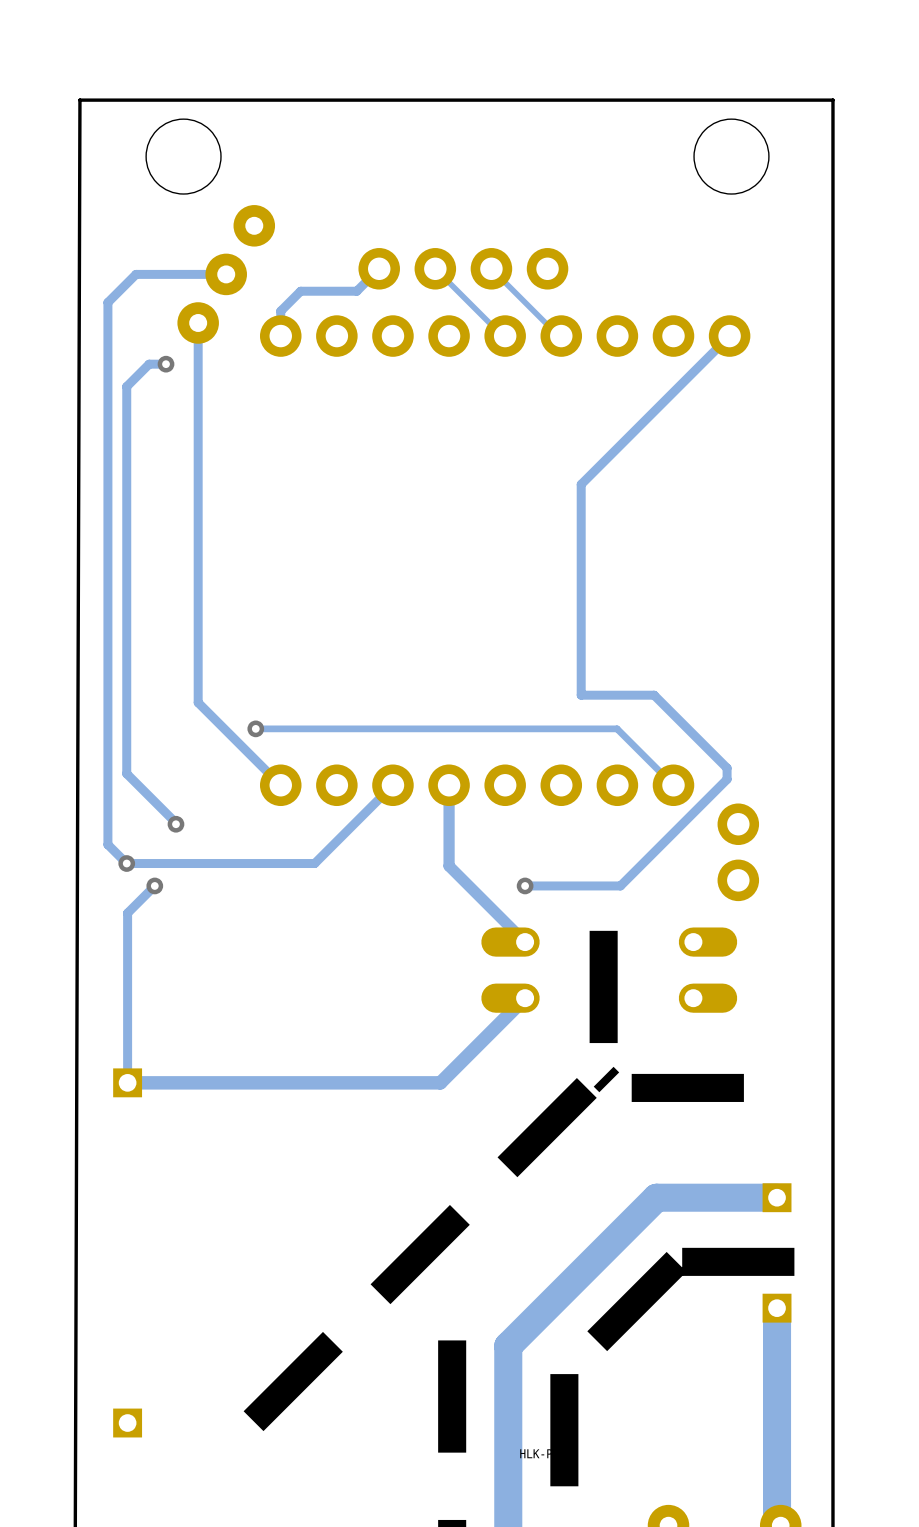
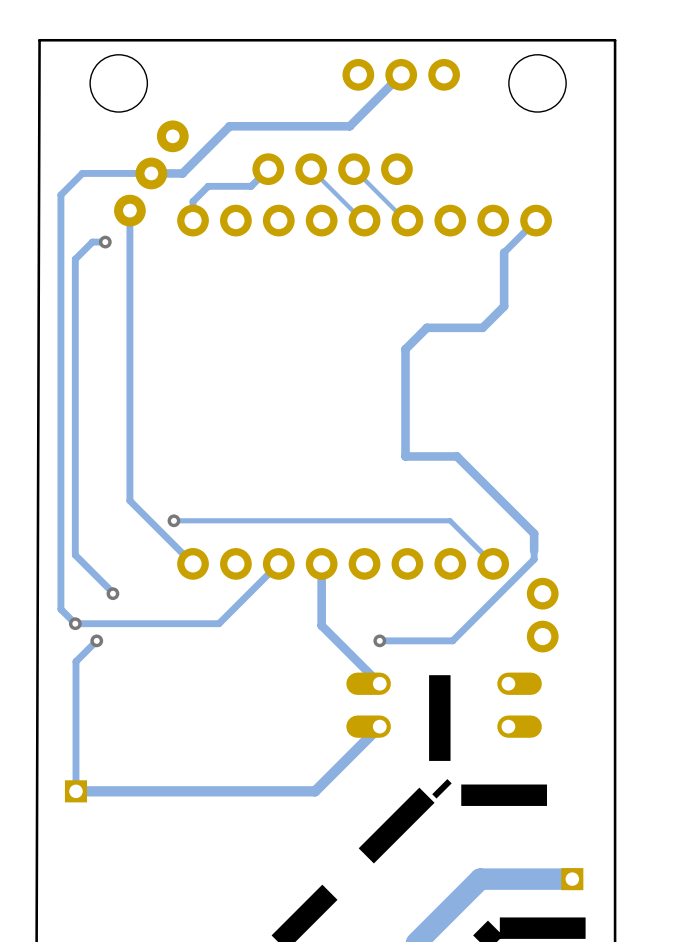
track: none -> (401, 74) (349, 126) (229, 126) (182, 173) (151, 173)
part: none -> (401, 74)
track: (687, 377) (581, 484) (581, 695) (654, 695) (727, 768) -> (504, 252) (504, 306) (482, 327) (426, 327) (405, 349) (405, 456) (456, 456) (534, 533) (534, 550)

